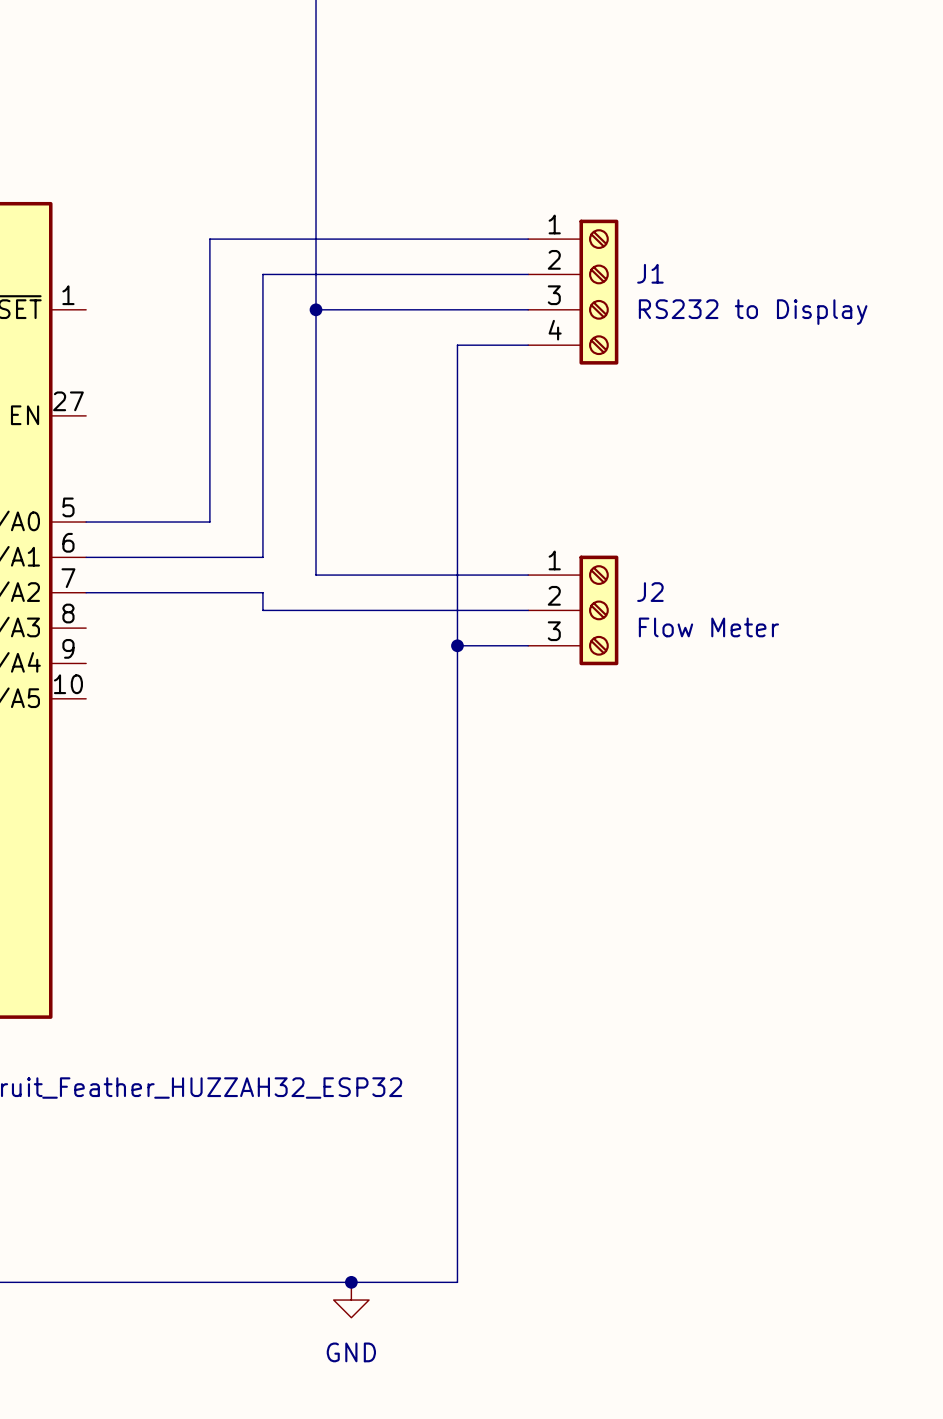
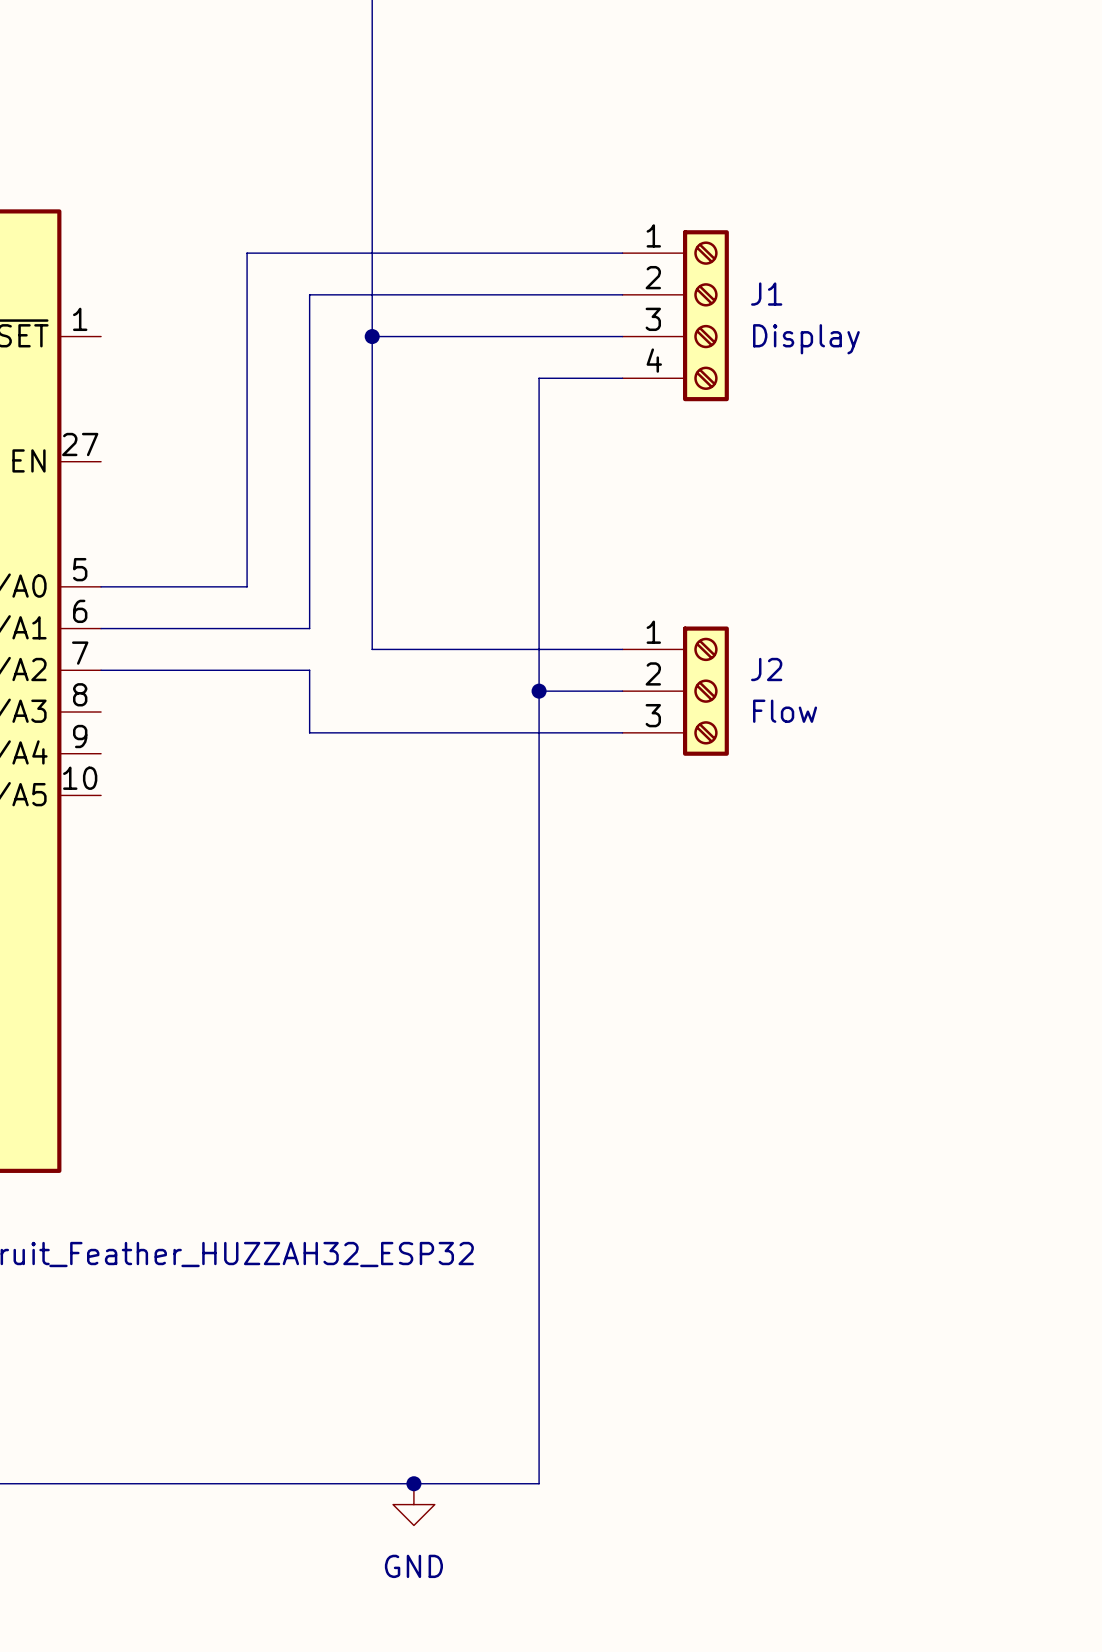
J1 value: RS232 to Display (753, 312) -> Display (806, 339)
wire: (262, 610) (457, 610) -> (309, 691) (309, 732) (539, 732)
J2 value: Flow Meter (708, 627) -> Flow (785, 711)
junction position: (457, 645) -> (539, 691)

